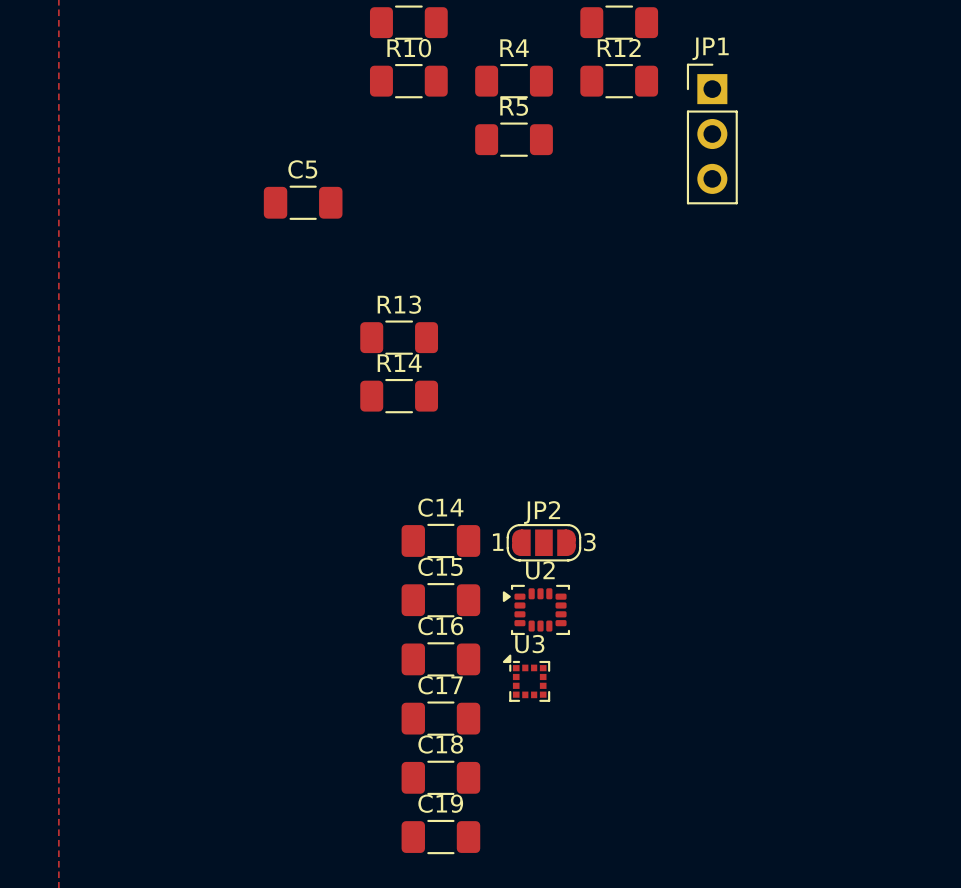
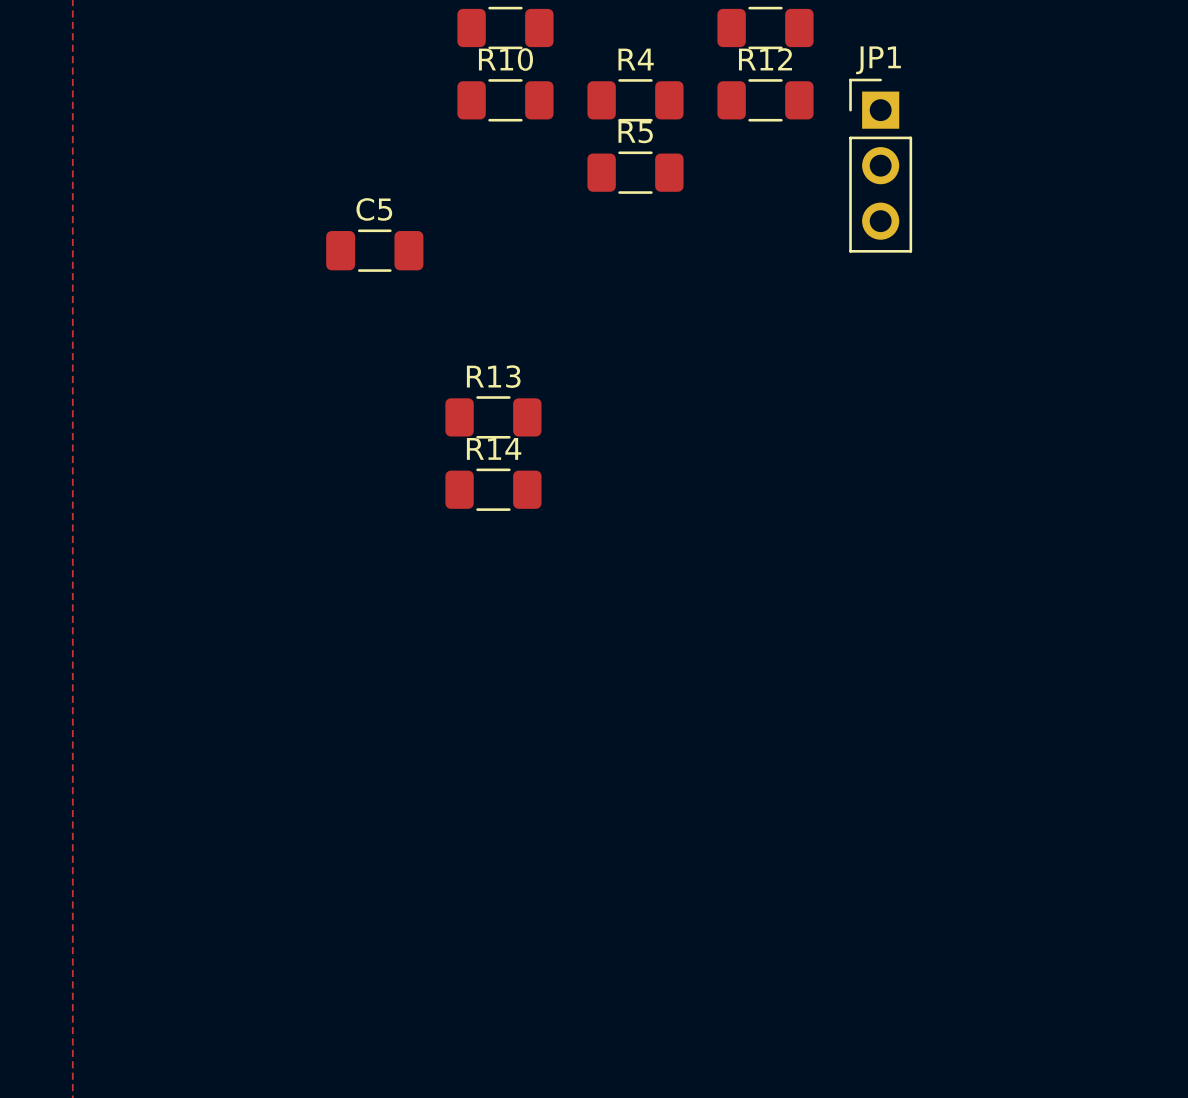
C14: (440, 540) -> none
JP2: (543, 542) -> none
C15: (440, 600) -> none
U2: (536, 609) -> none
C16: (440, 659) -> none
U3: (526, 678) -> none
C17: (440, 718) -> none
C18: (440, 777) -> none
C19: (440, 837) -> none

